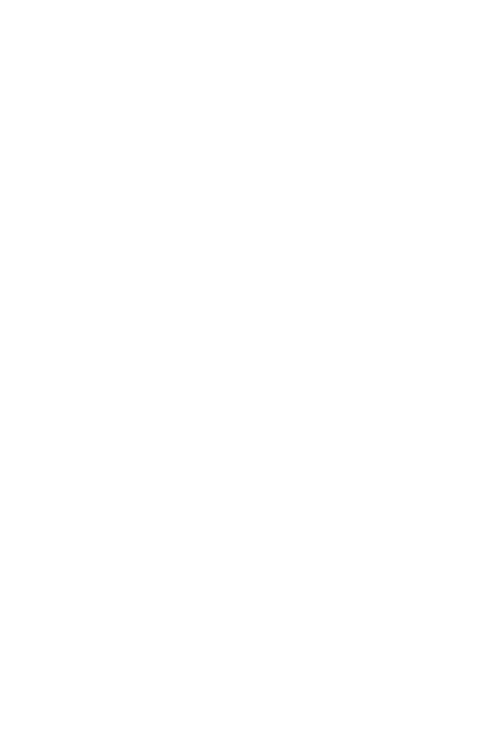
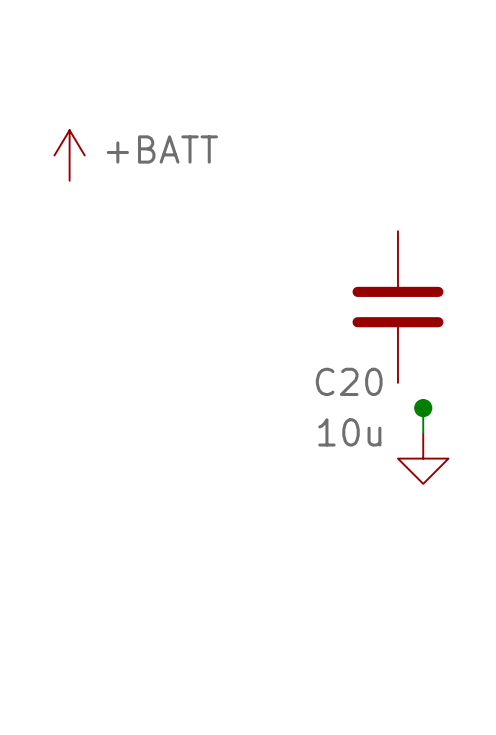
power symbol: none -> +BATT (69, 155)
C20: none -> 10u (397, 307)
wire: none -> (423, 408) (423, 433)
junction: none -> (423, 408)
power symbol: none -> (423, 458)

